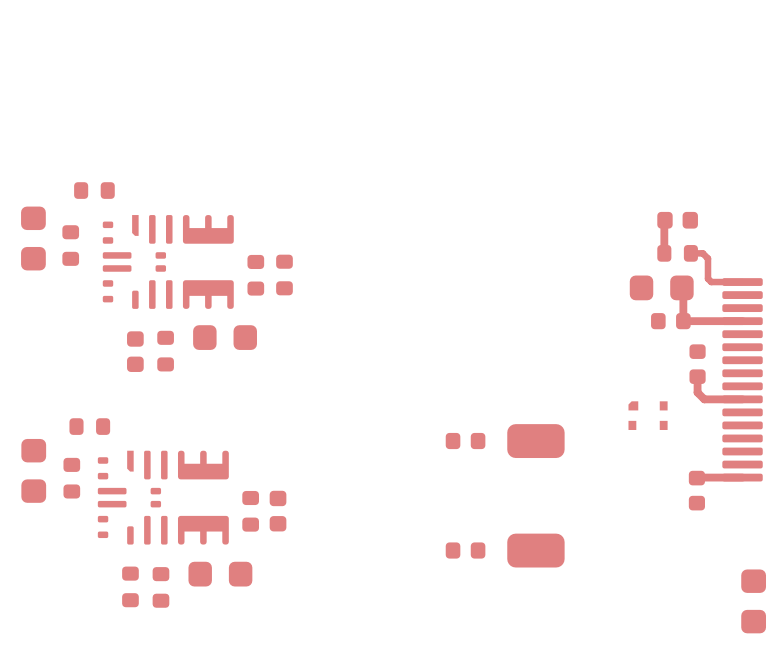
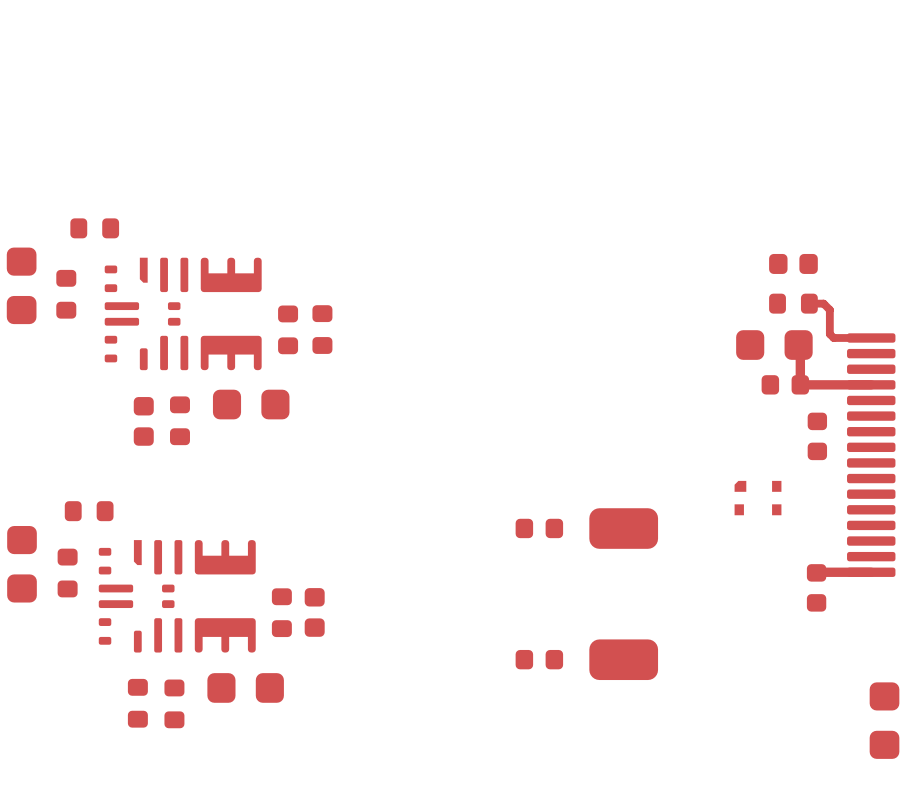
top track: (664, 220) (664, 253) -> none
top track: (697, 376) (697, 392) (704, 399) (742, 399) -> none

